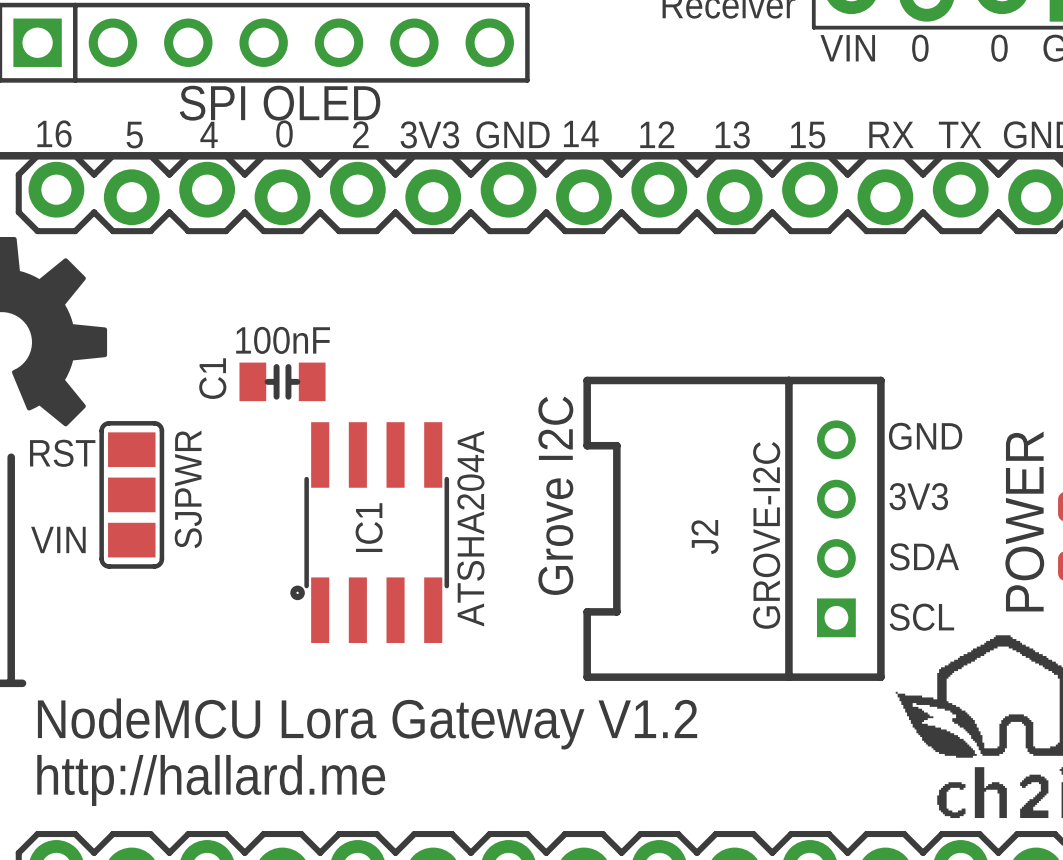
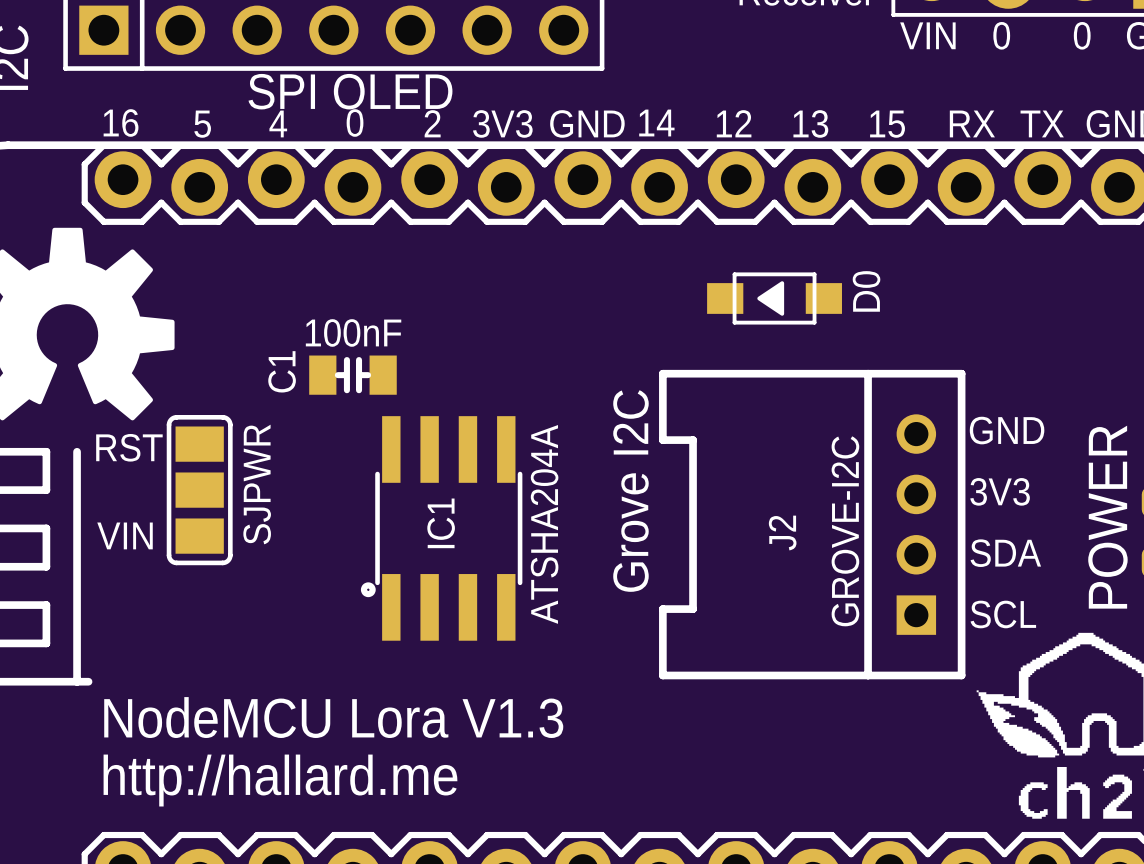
D0: none -> (774, 298)
text: NodeMCU Lora Gateway V1.2 (367, 723) -> NodeMCU Lora V1.3 (333, 717)

